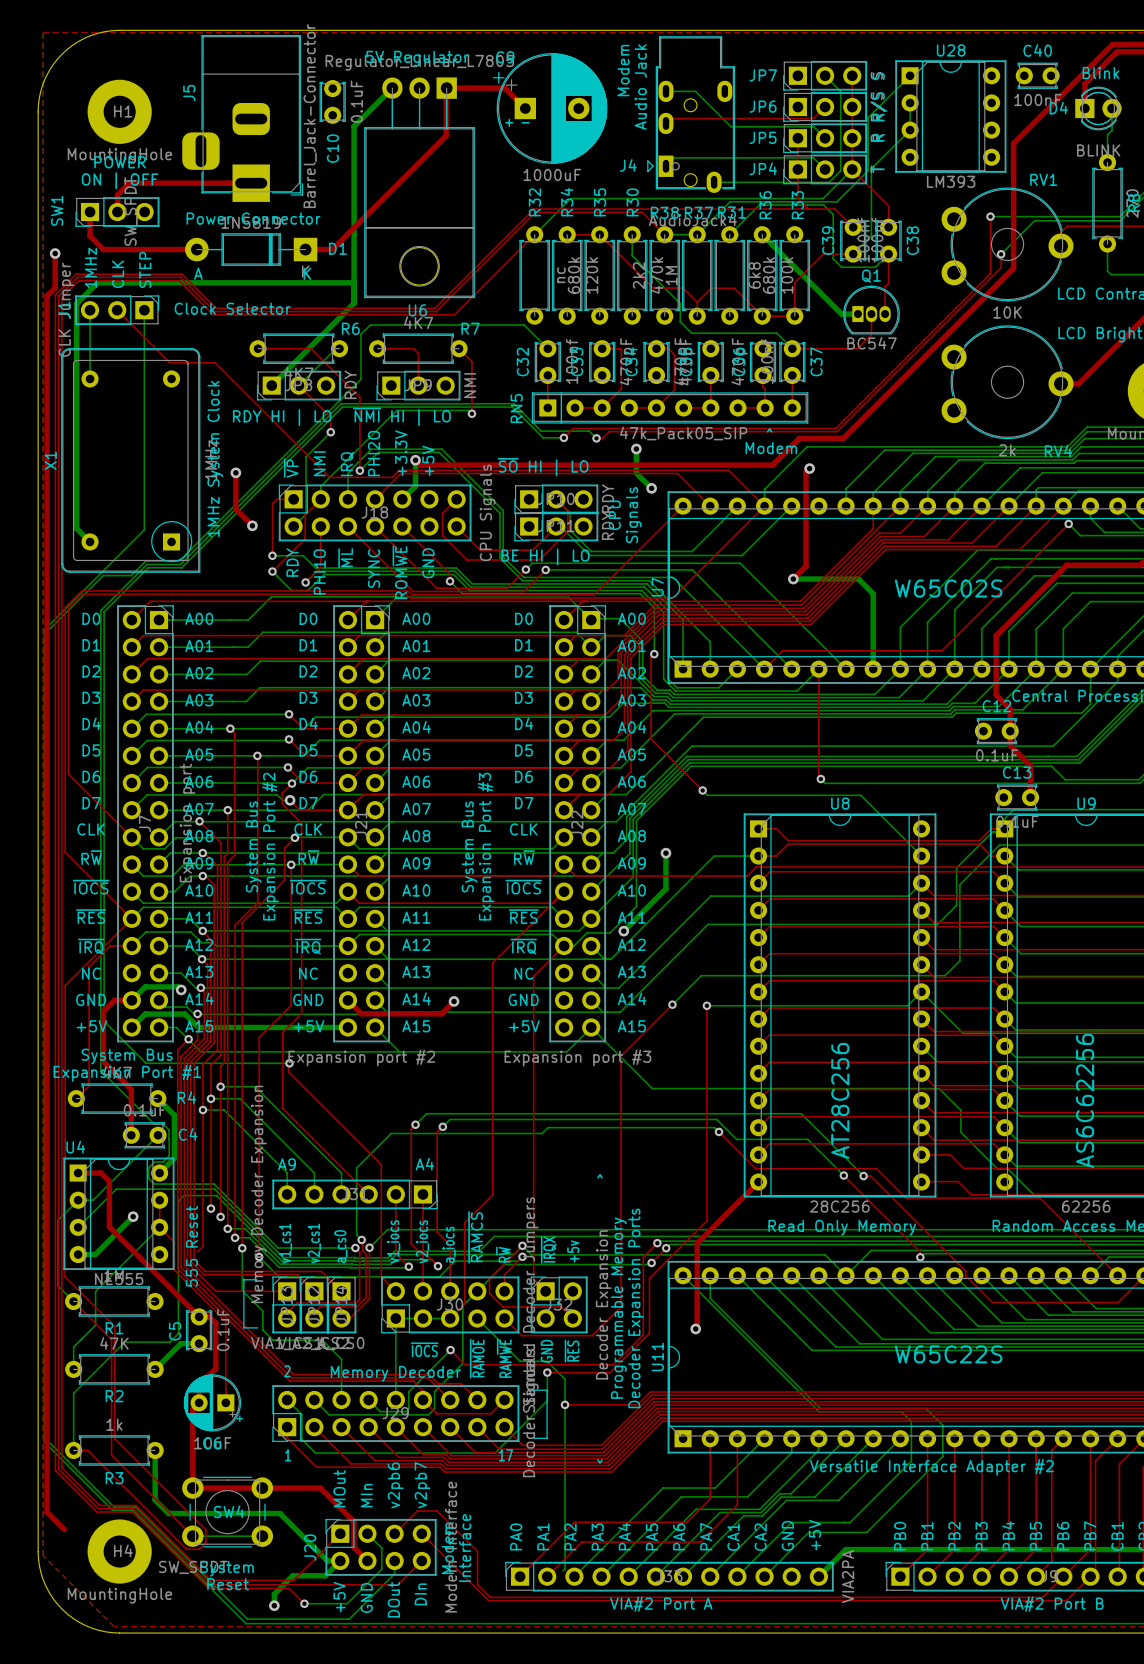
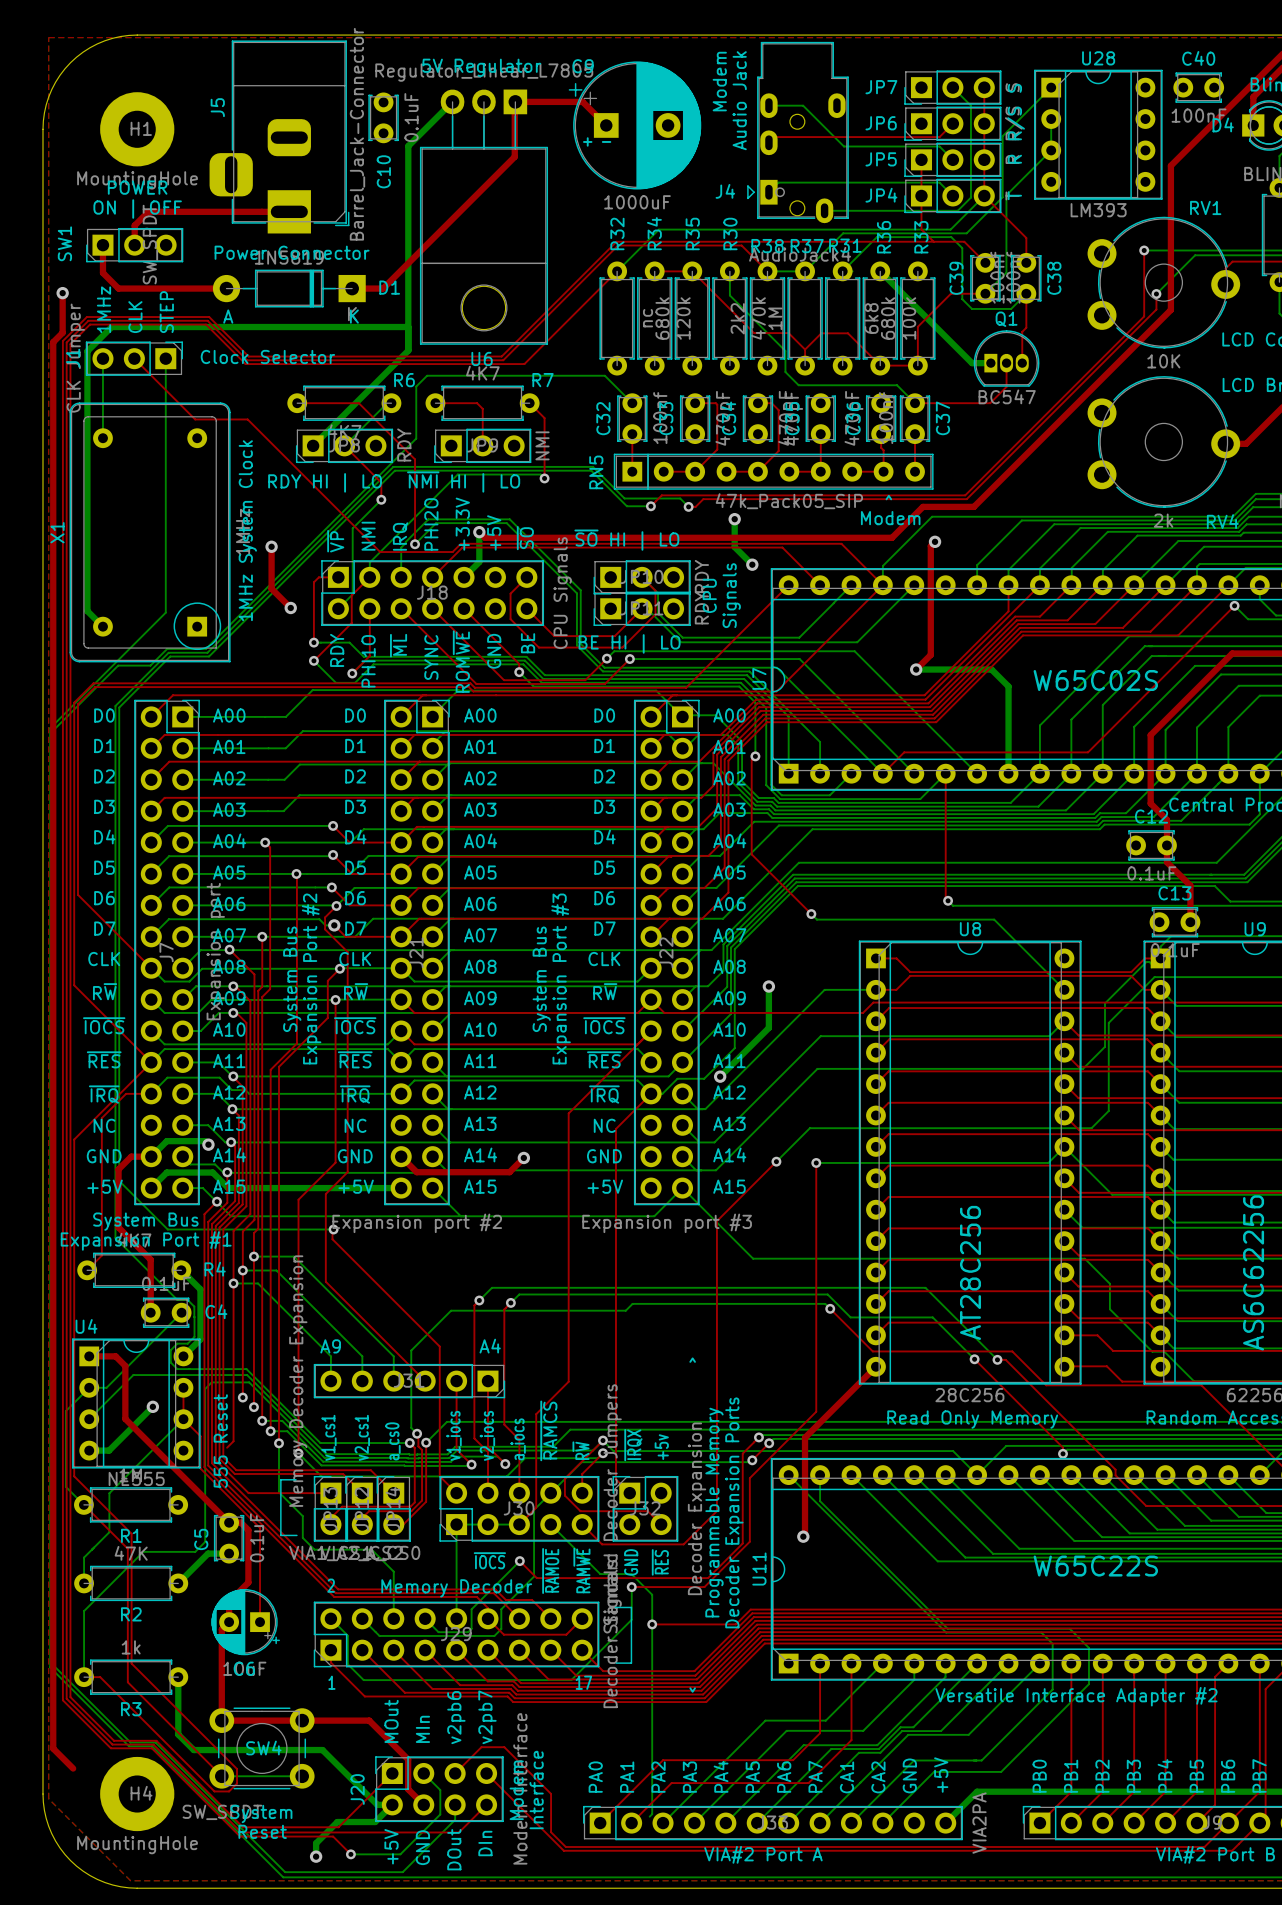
text: none -> ~{SO} (525, 538)
text: none -> BE (528, 643)

